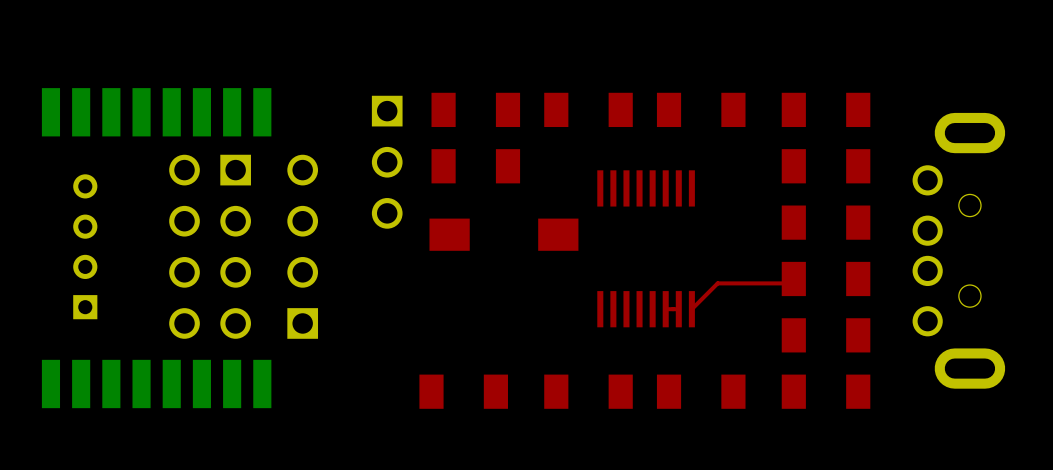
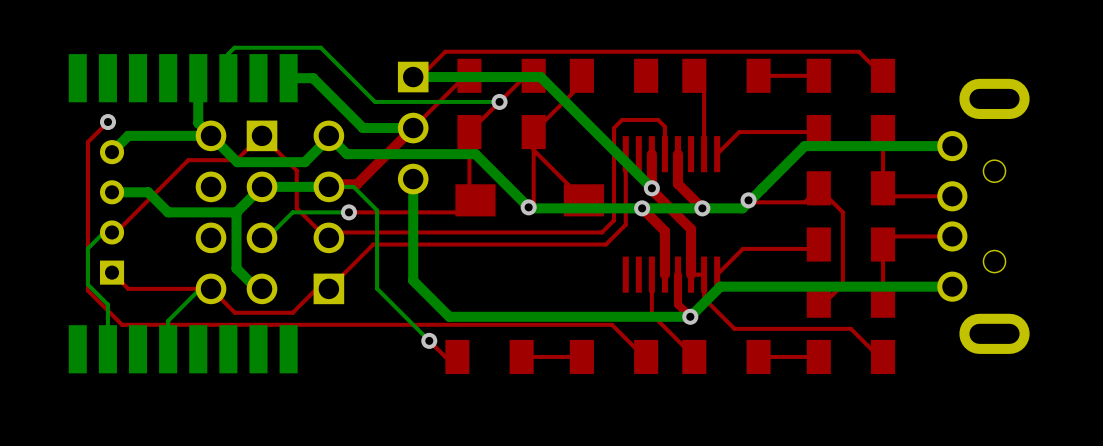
top track: none -> (469, 75) (465, 75) (356, 184) (331, 184) (328, 186)
top track: none -> (533, 75) (525, 75) (469, 132) (469, 194) (475, 200) (469, 200) (457, 212) (348, 212)
top track: none -> (581, 75) (581, 83) (533, 132) (533, 202) (528, 207)
top track: none -> (694, 75) (704, 85) (704, 154)
top track: none -> (818, 75) (758, 75)
top track: none -> (883, 75) (858, 51) (445, 51) (420, 77) (413, 77)
bottom track: none -> (413, 77) (540, 77) (651, 188)
bottom track: none -> (198, 78) (198, 123) (237, 162) (304, 162) (328, 135)
bottom track: none -> (228, 78) (228, 53) (234, 47) (320, 47) (375, 101) (499, 101)
bottom track: none -> (288, 78) (313, 78) (363, 128) (413, 128)
via: none -> (499, 101)
top track: none -> (108, 122) (87, 142) (87, 290) (122, 324) (612, 324) (646, 356)
via: none -> (108, 122)
top track: none -> (818, 132) (739, 132) (717, 154)
top track: none -> (883, 132) (883, 188) (891, 196) (952, 196)
bottom track: none -> (211, 135) (128, 135) (112, 152)
bottom track: none -> (328, 136) (346, 154) (475, 154) (529, 208) (742, 208) (804, 146) (952, 146)
top track: none -> (533, 150) (583, 200)
top track: none -> (625, 154) (625, 224) (605, 244) (373, 244) (328, 288) (316, 288) (292, 312) (234, 312) (211, 288) (128, 288) (112, 272)
top track: none -> (651, 154) (651, 190) (691, 229) (691, 274)
top track: none -> (664, 154) (664, 126) (658, 120) (622, 120) (614, 128) (614, 220) (601, 232) (334, 232) (326, 237) (296, 208) (296, 170) (260, 135) (236, 160) (188, 160) (116, 232) (112, 232)
top track: none -> (677, 154) (677, 183) (702, 208)
bottom track: none -> (413, 179) (413, 280) (449, 316) (690, 316) (720, 286) (952, 286)
via: none -> (651, 188)
bottom track: none -> (112, 192) (148, 192) (168, 212) (236, 212)
top track: none -> (748, 200) (750, 202) (804, 202) (818, 188) (842, 212) (842, 284) (826, 300) (818, 300)
via: none -> (748, 200)
via: none -> (528, 207)
top track: none -> (642, 208) (664, 231) (664, 274)
via: none -> (642, 208)
via: none -> (702, 208)
bottom track: none -> (236, 212) (236, 268) (256, 288) (262, 288)
bottom track: none -> (236, 212) (262, 186) (353, 186) (377, 210) (377, 288) (429, 340)
bottom track: none -> (348, 212) (292, 212) (267, 237) (262, 237)
via: none -> (348, 212)
bottom track: none -> (112, 232) (104, 232) (87, 248) (87, 284) (107, 304) (107, 349)
top track: none -> (952, 236) (891, 236) (883, 244) (883, 300)
top track: none -> (651, 274) (651, 314) (694, 356)
top track: none -> (677, 274) (677, 304) (690, 316)
top track: none -> (704, 274) (704, 298) (734, 328) (850, 328) (879, 356) (883, 356)
bottom track: none -> (211, 288) (200, 288) (168, 320) (168, 349)
via: none -> (690, 316)
top track: none -> (429, 340) (445, 356) (457, 356)
via: none -> (429, 340)
top track: none -> (581, 356) (521, 356)
top track: none -> (818, 356) (758, 356)

